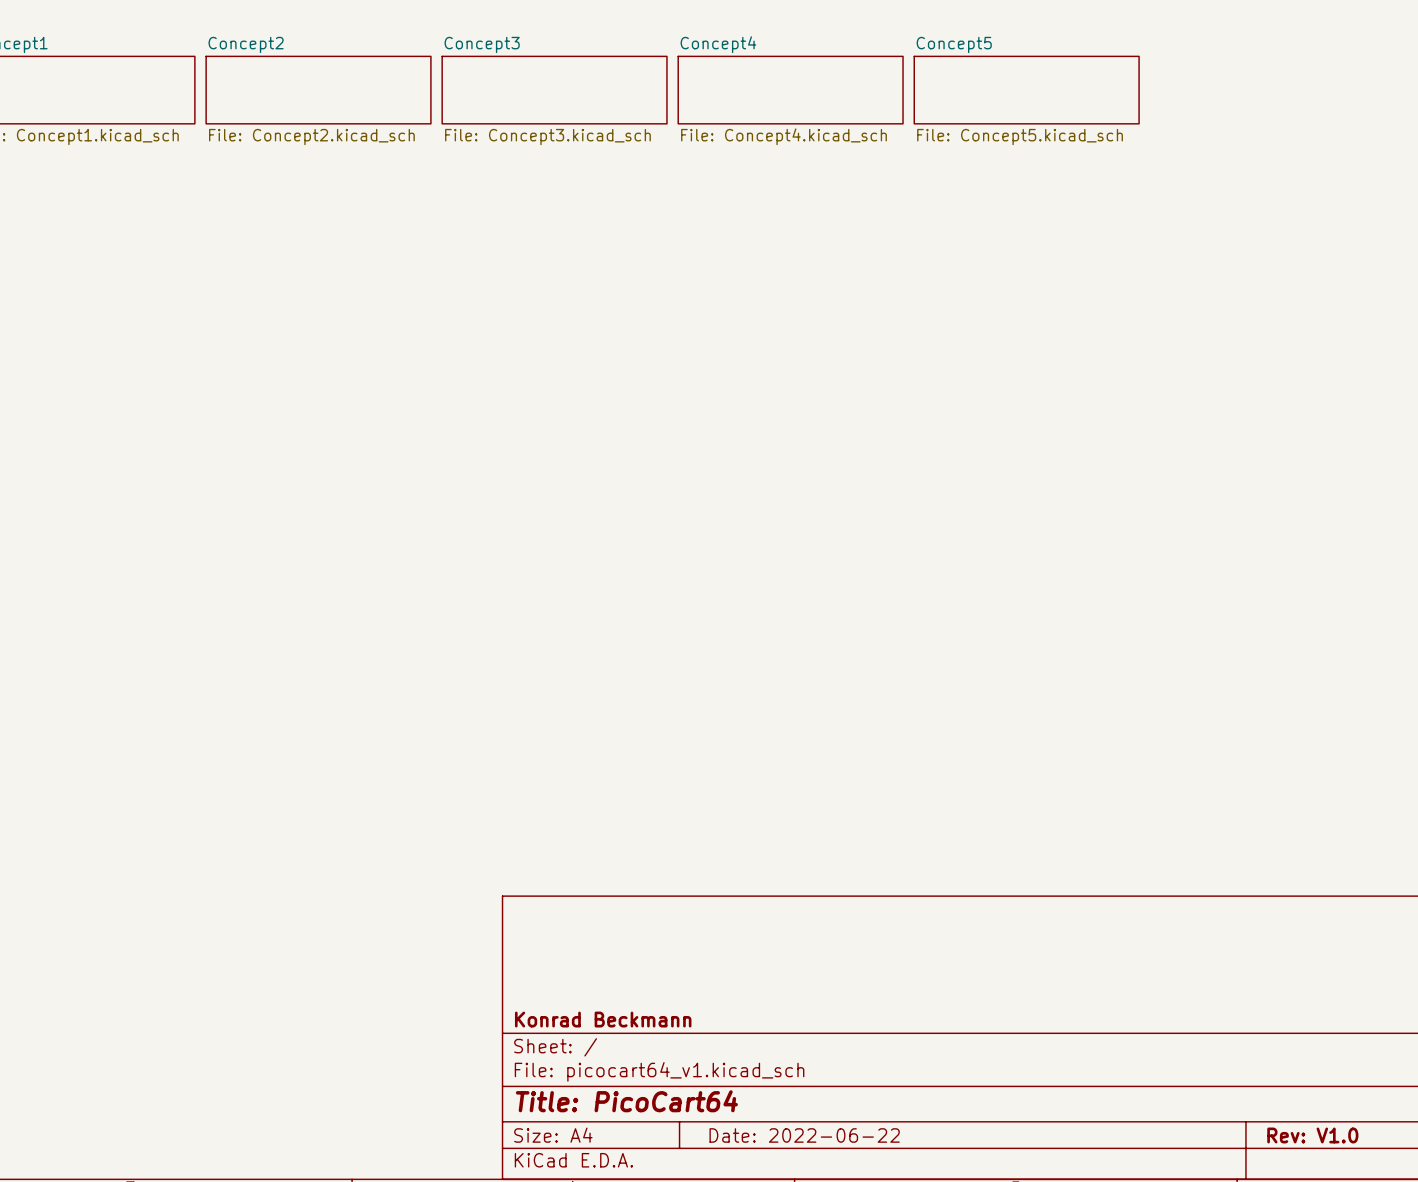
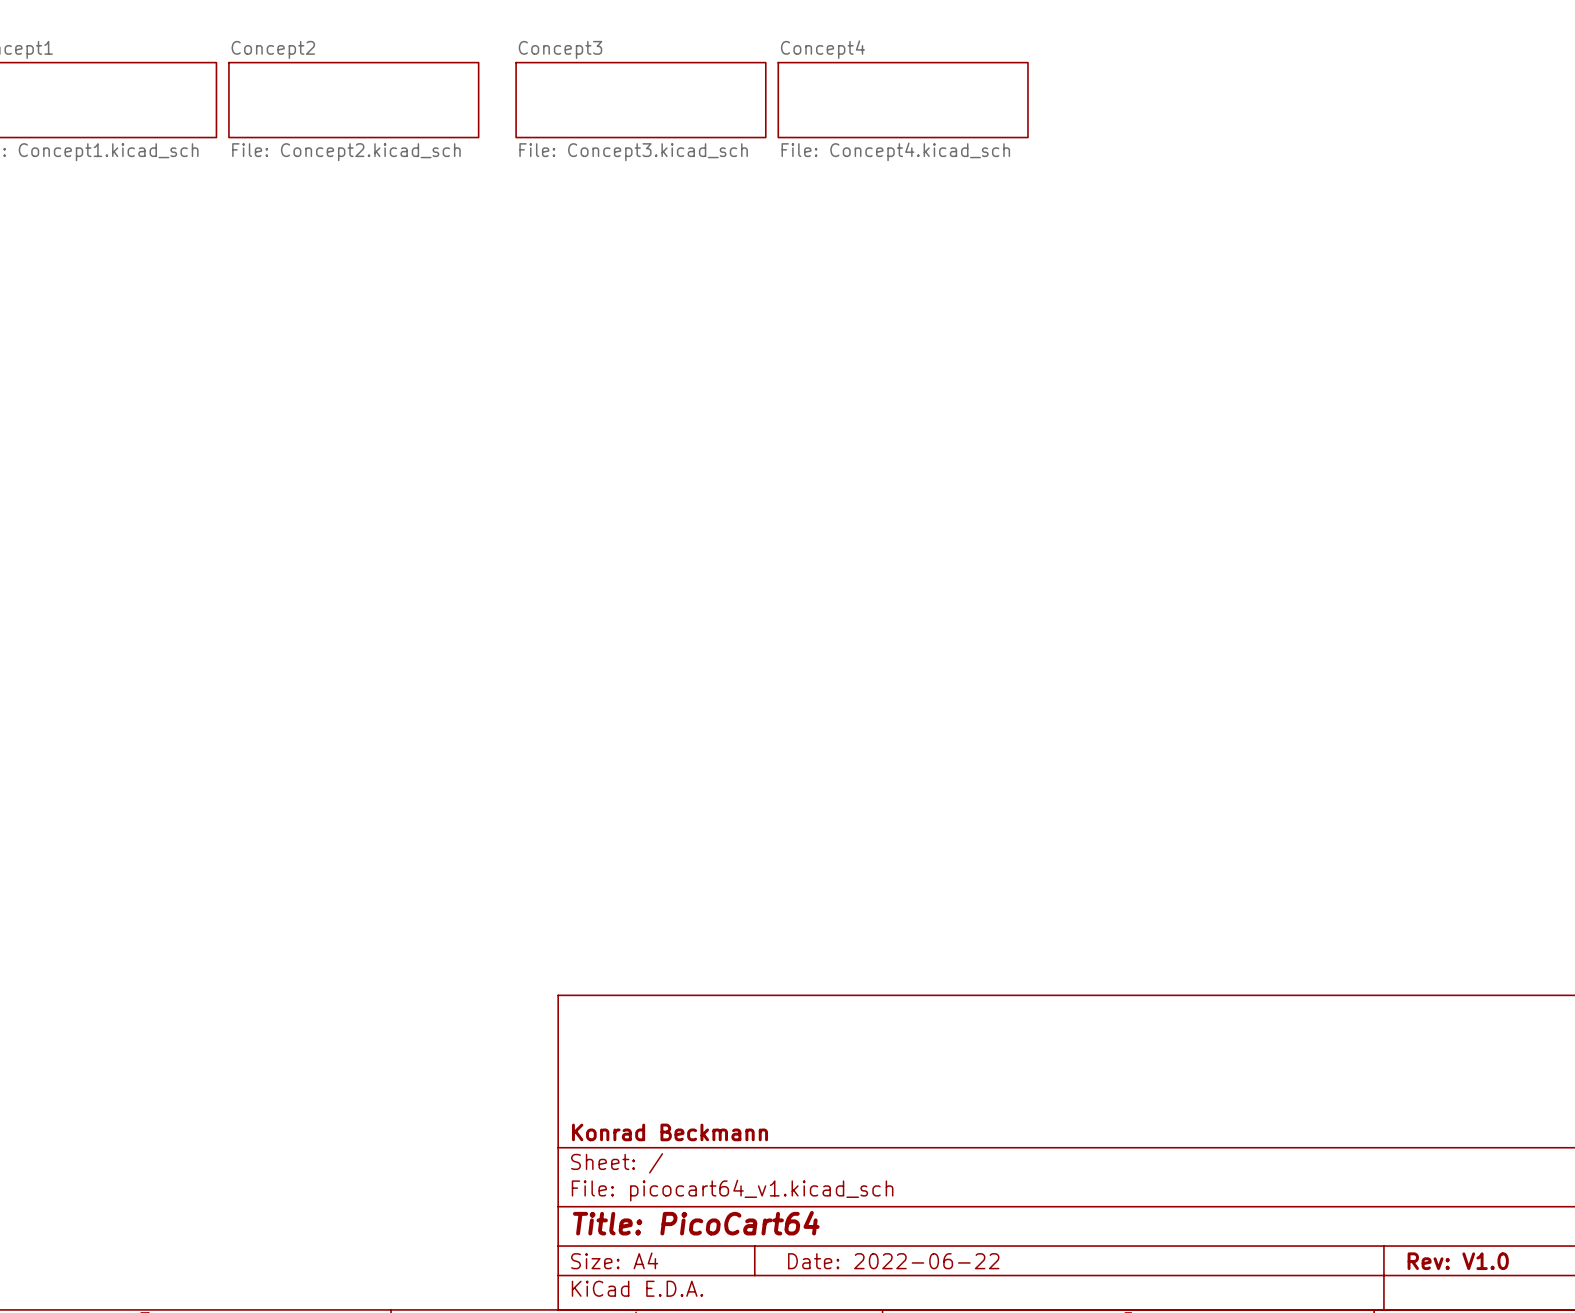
sheet Concept3 position: (554, 90) -> (640, 100)
sheet Concept4 position: (790, 90) -> (903, 100)
sheet Concept5: File: Concept5.kicad_sch (1026, 90) -> none

